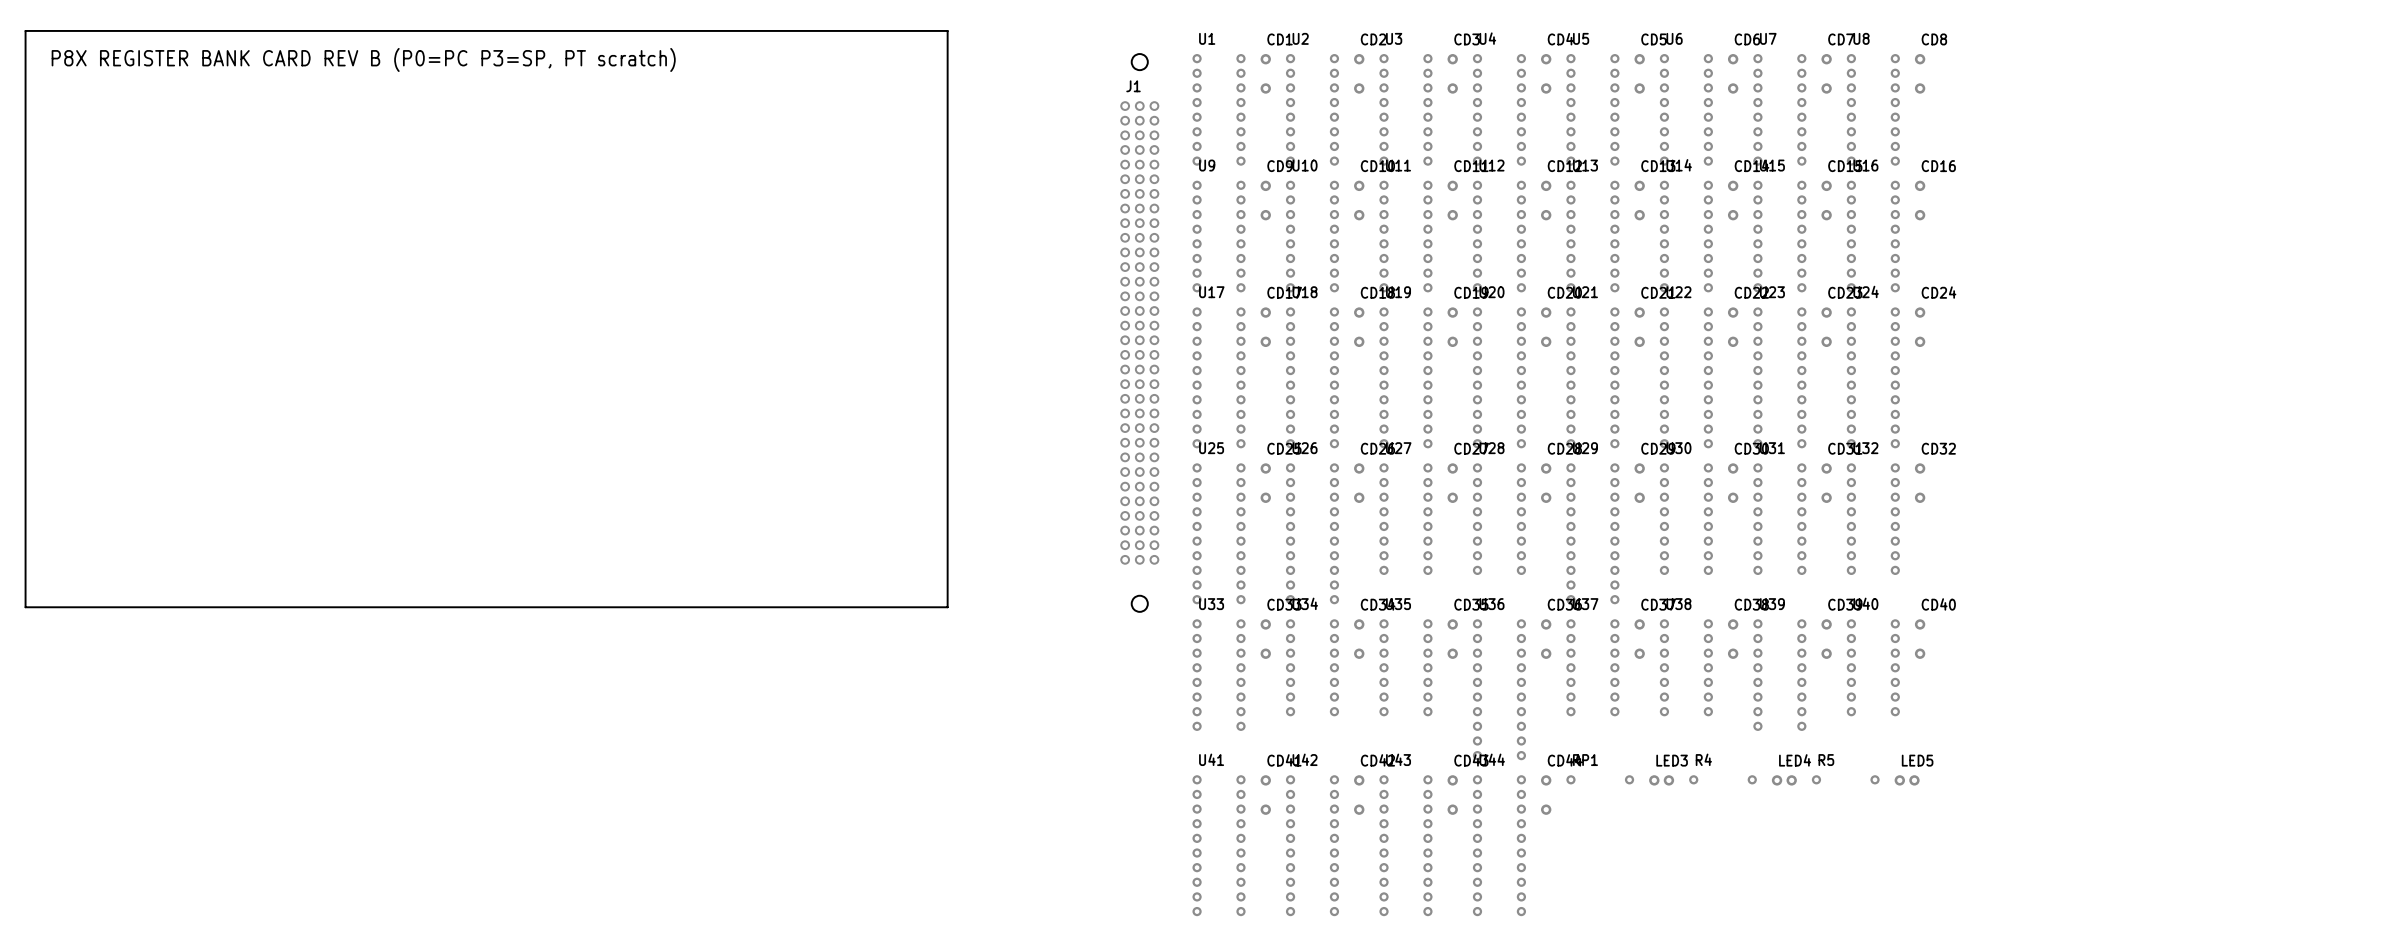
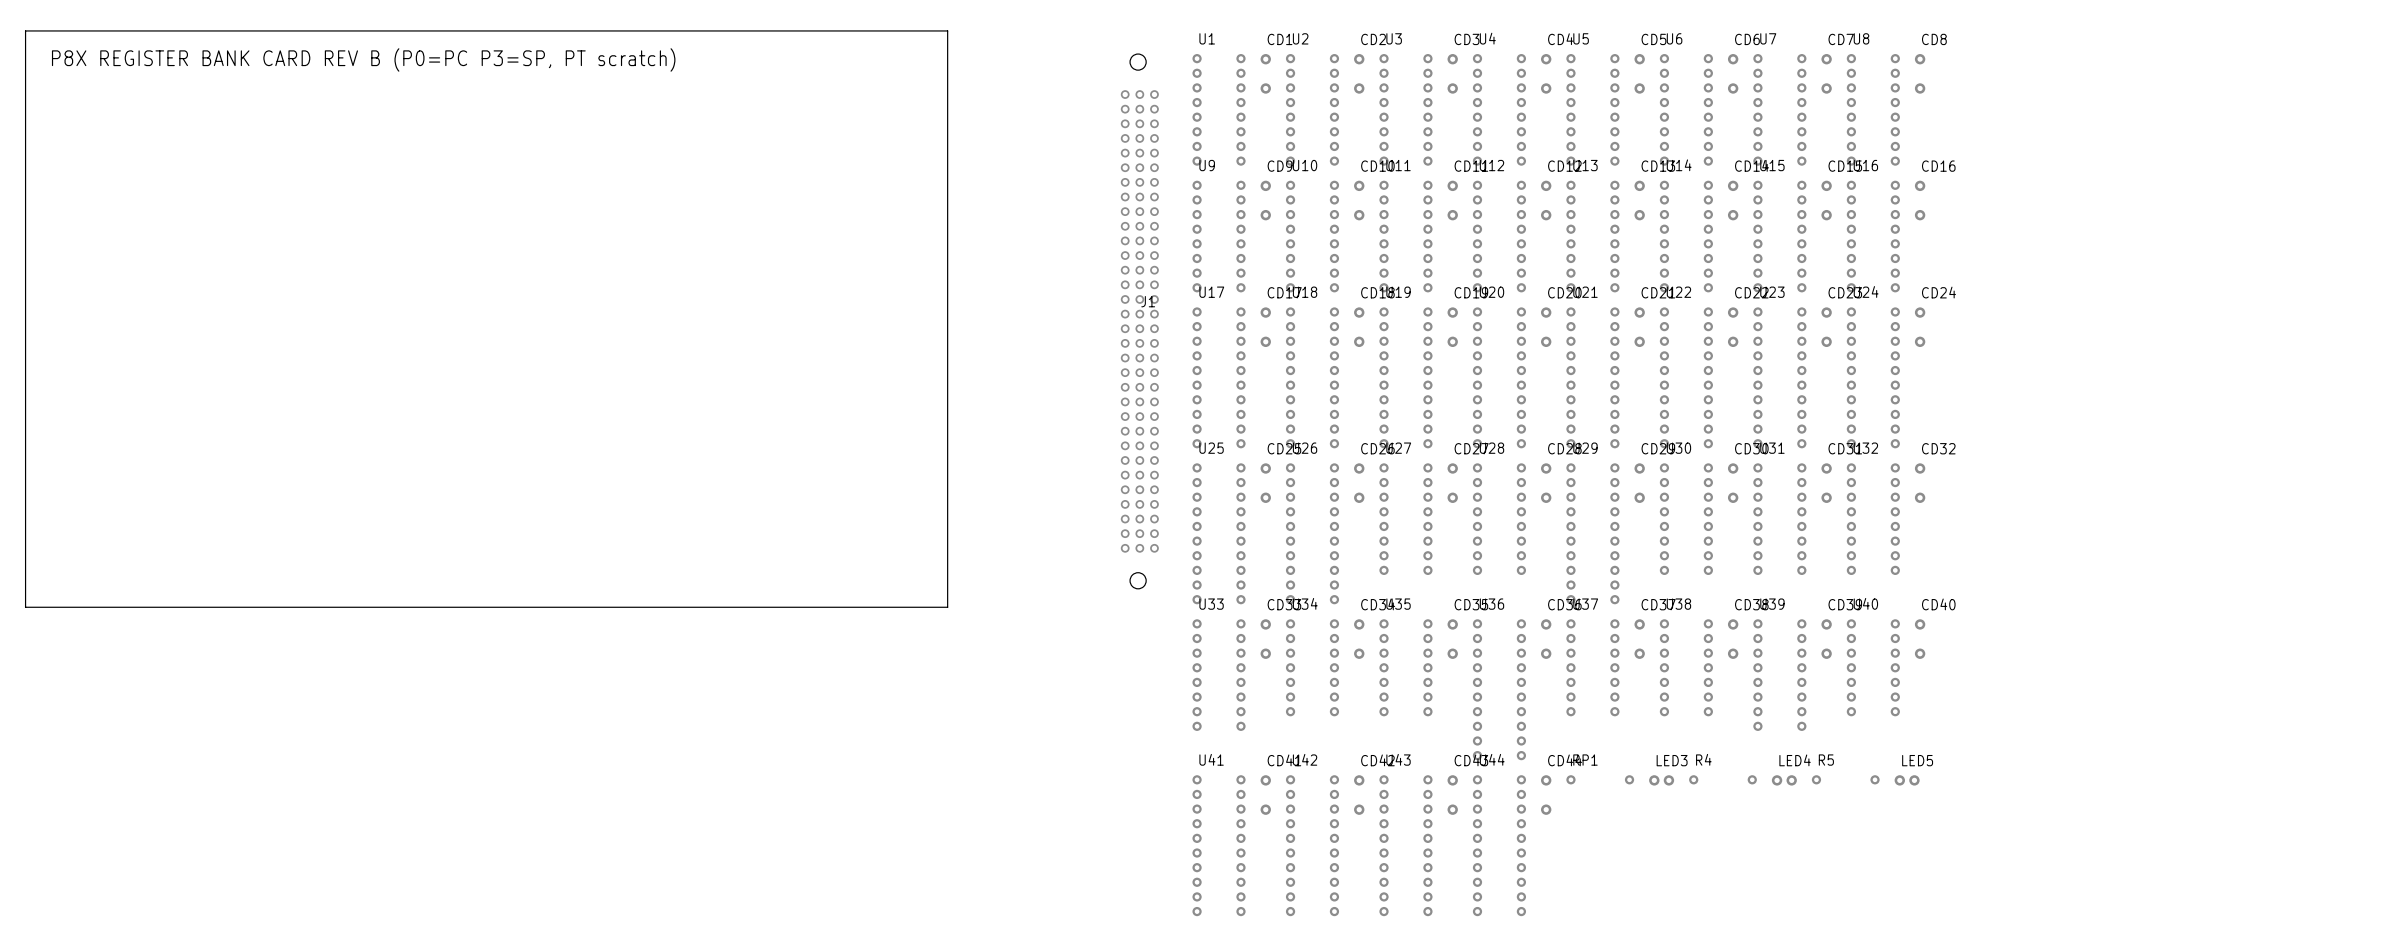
J1 footprint: [1120, 54, 1160, 612] -> [1120, 54, 1159, 589]
J1 name position: J1 (1133, 86) -> J1 (1148, 301)

